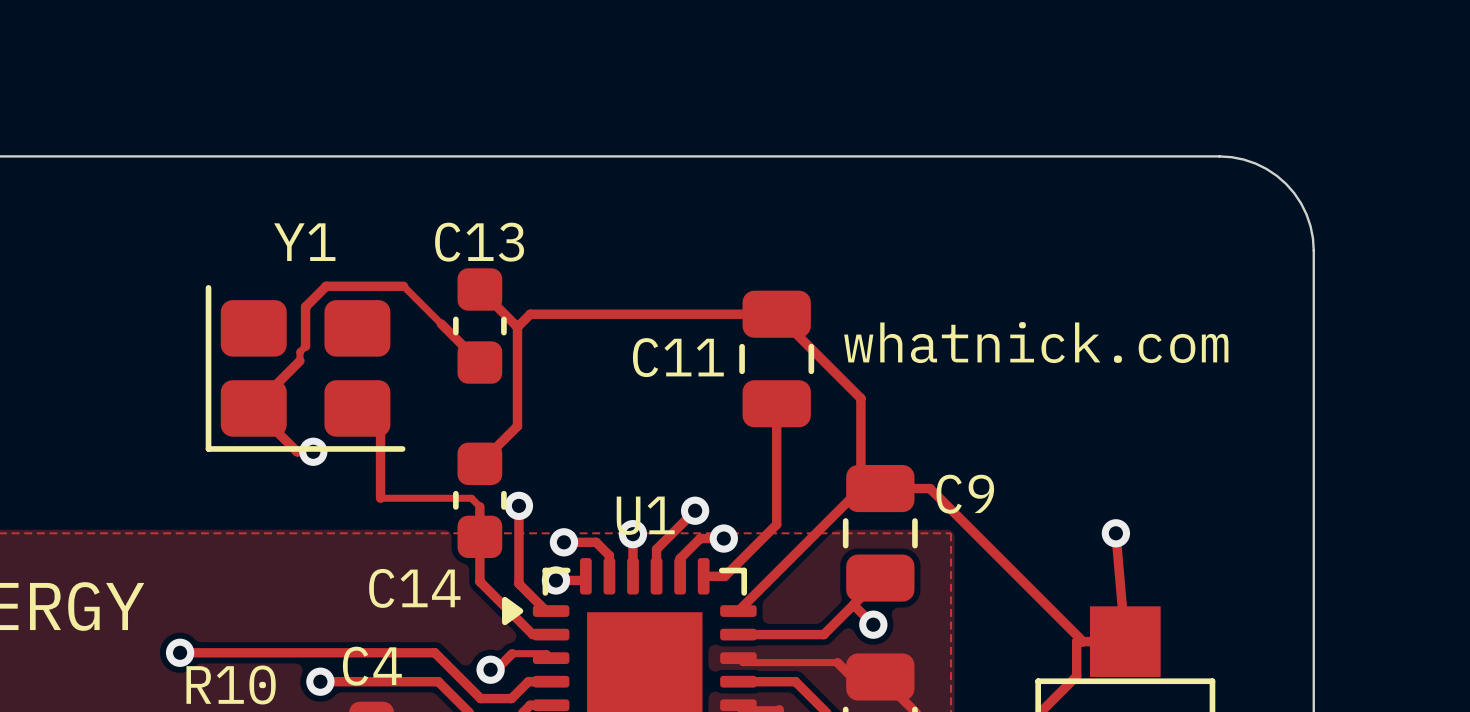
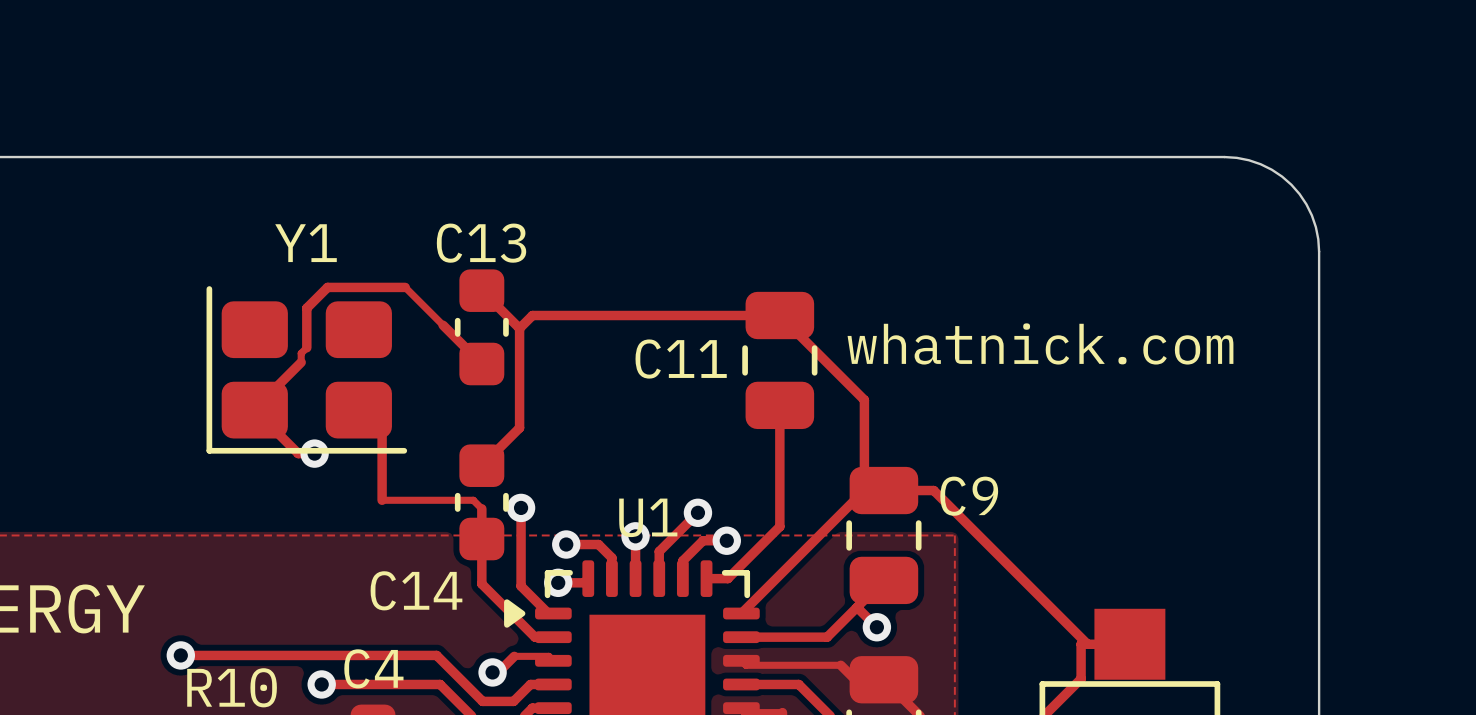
track: (1115, 533) (1125, 641) -> none
via: (1115, 533) -> none

